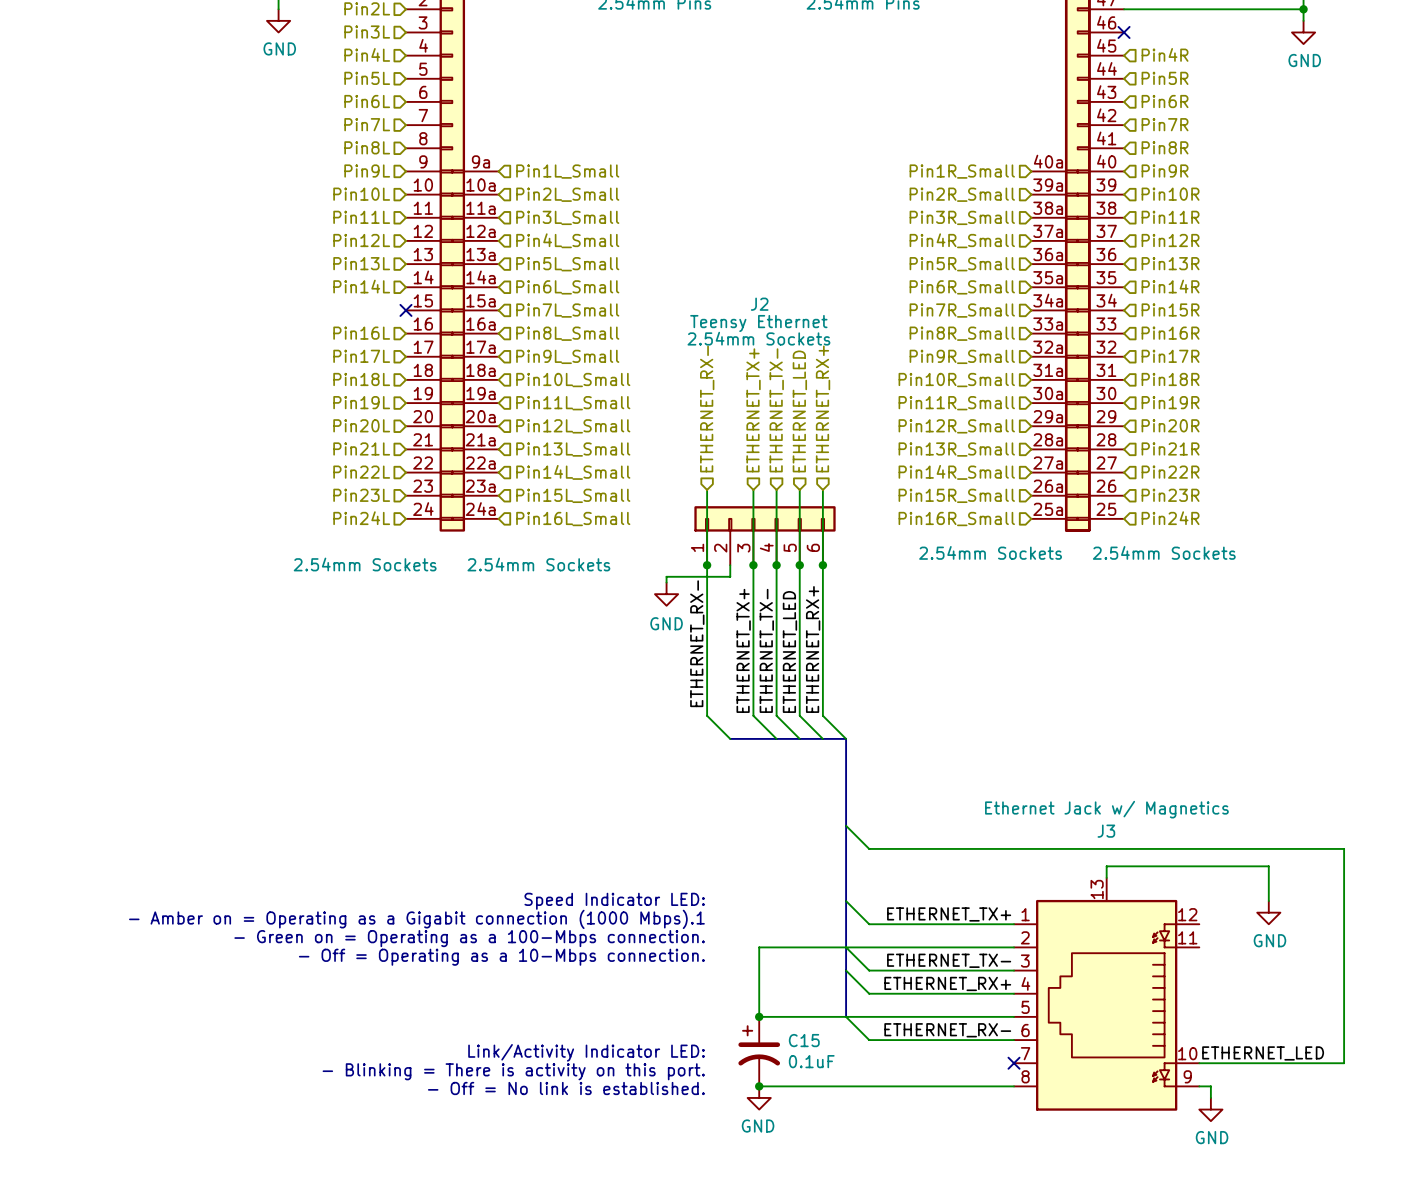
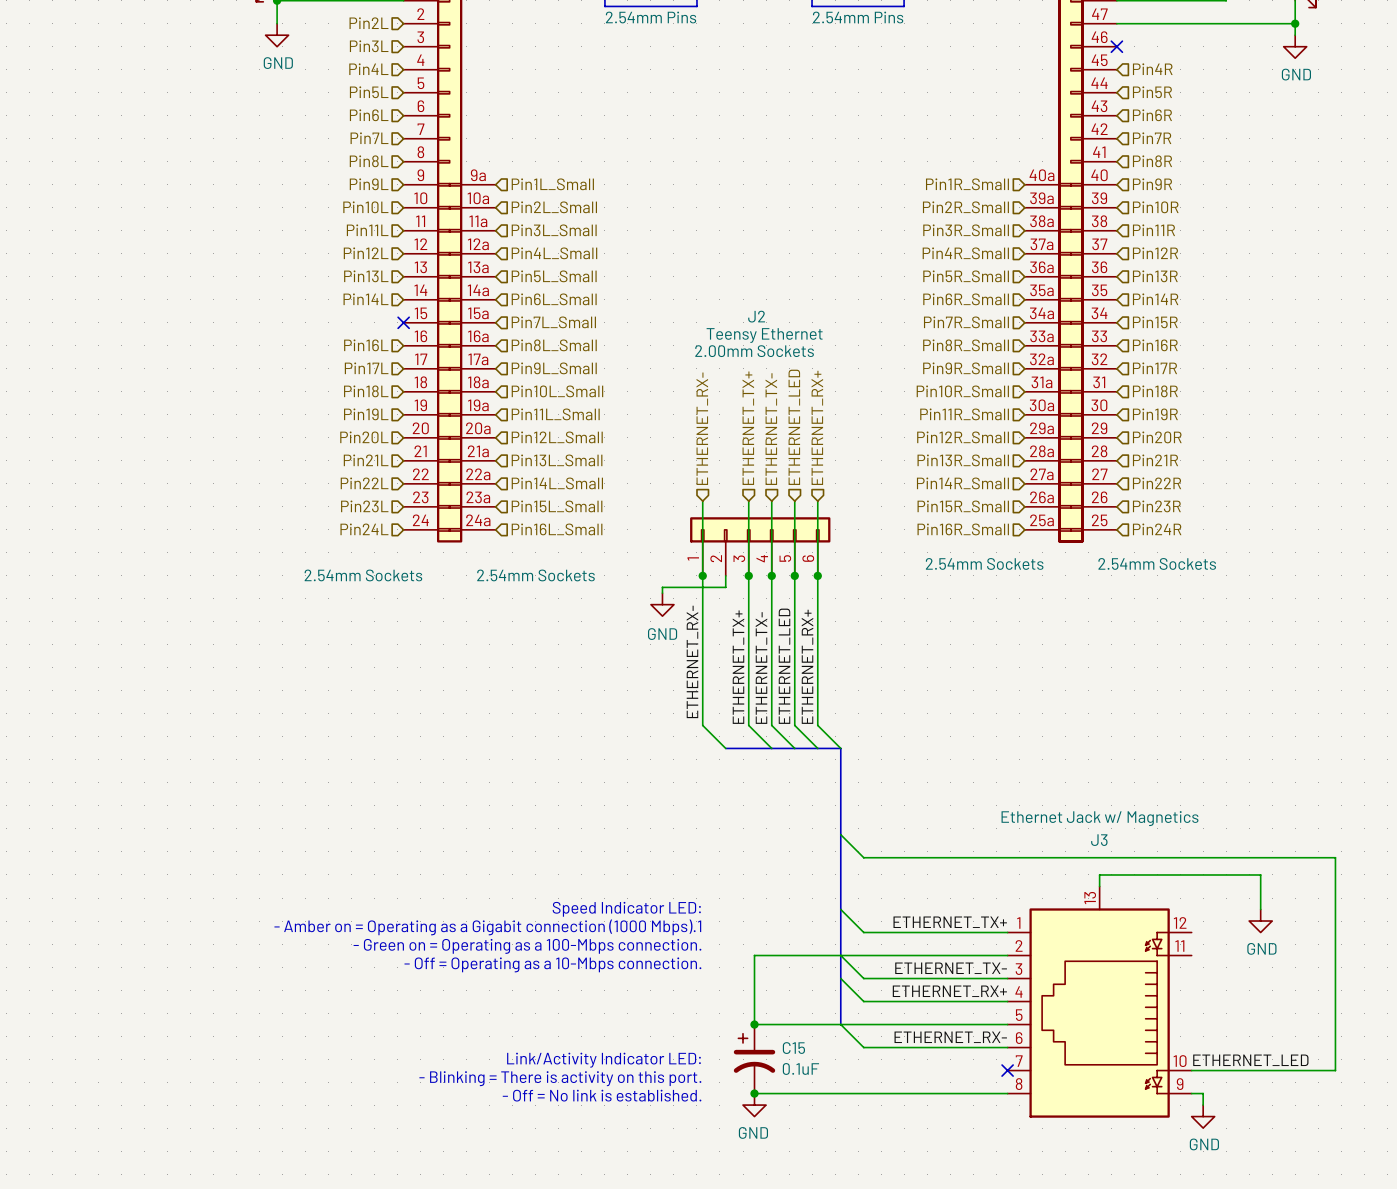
J2 text: 2.54mm Sockets (758, 338) -> 2.00mm Sockets (754, 351)

